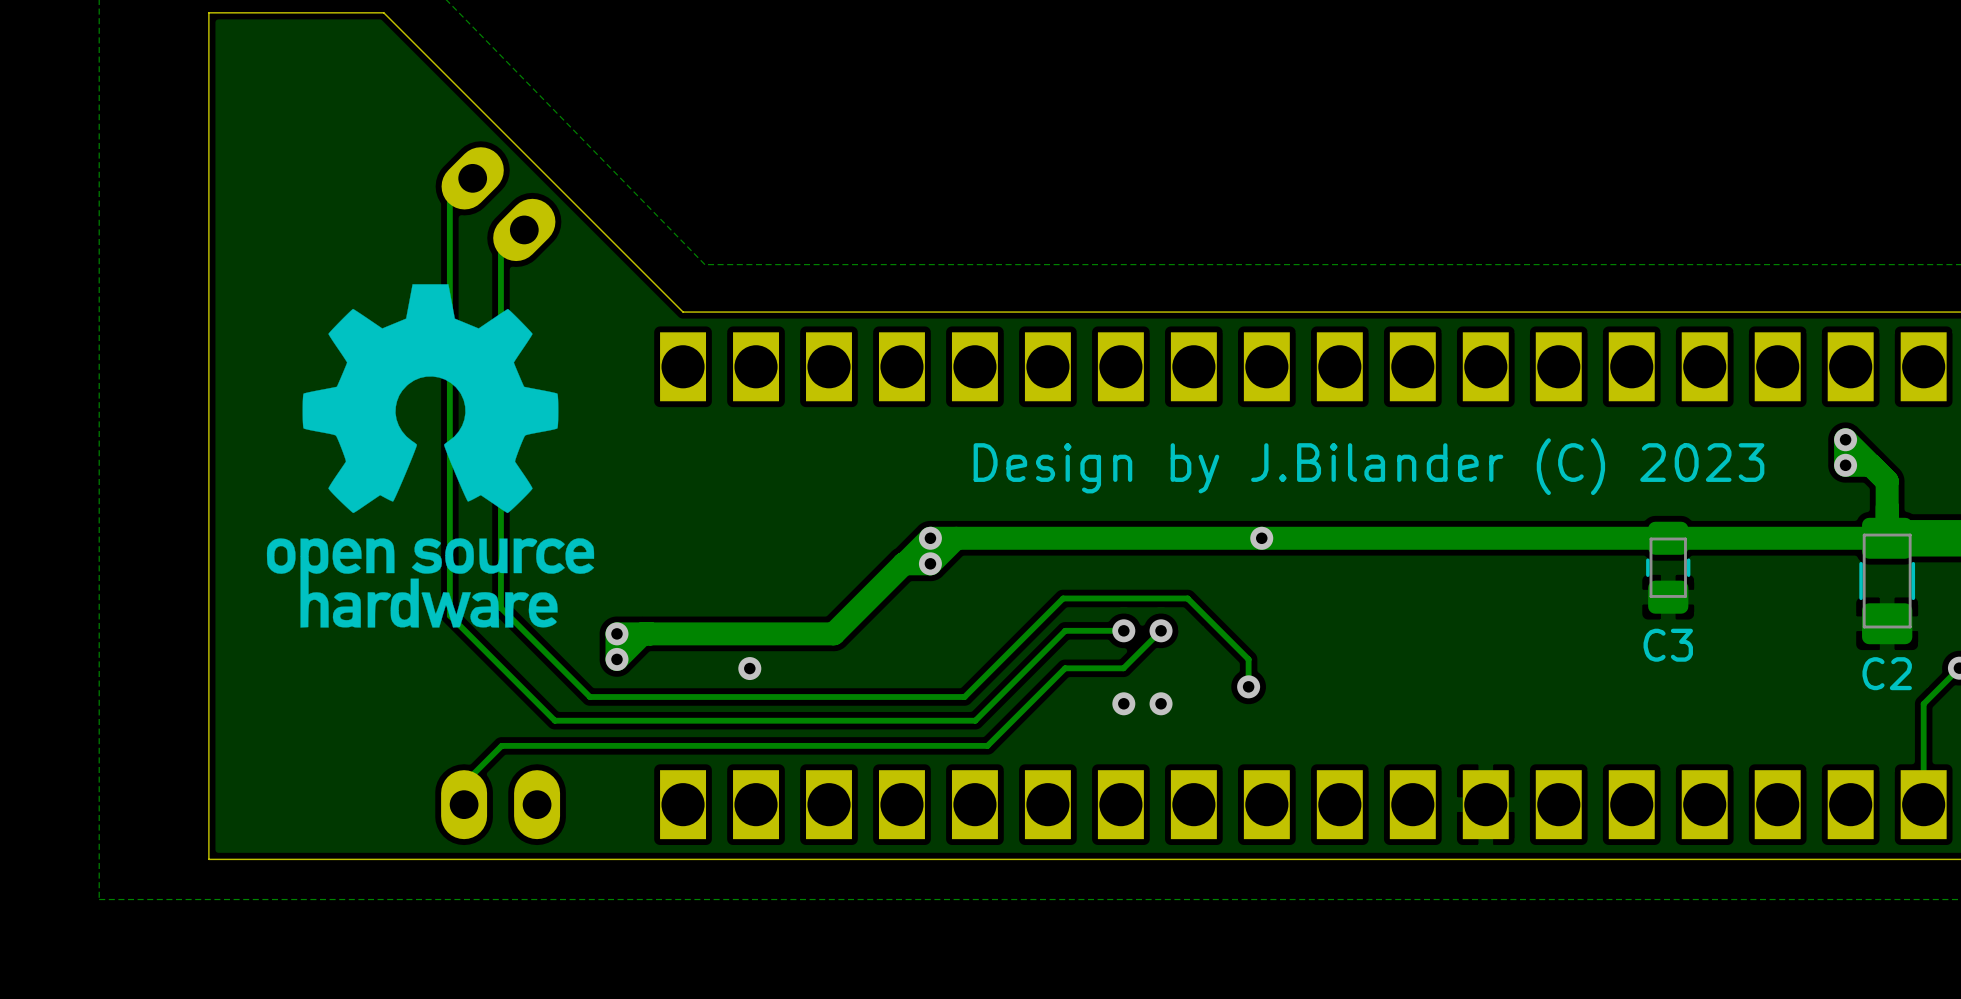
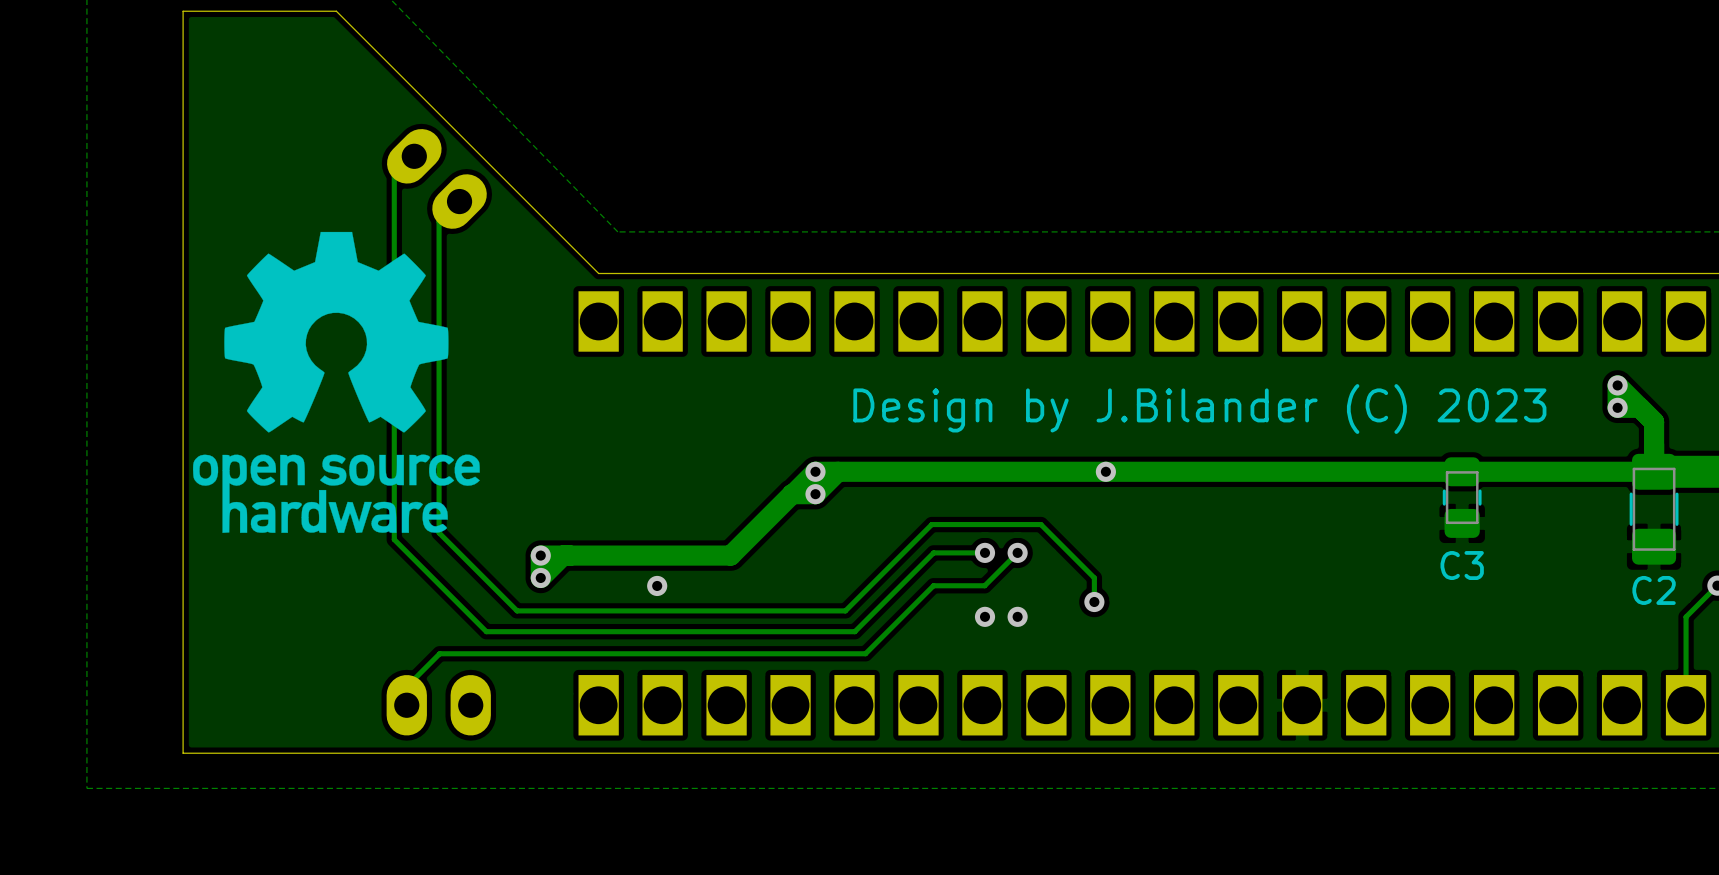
drawing position: (430, 455) -> (336, 382)

